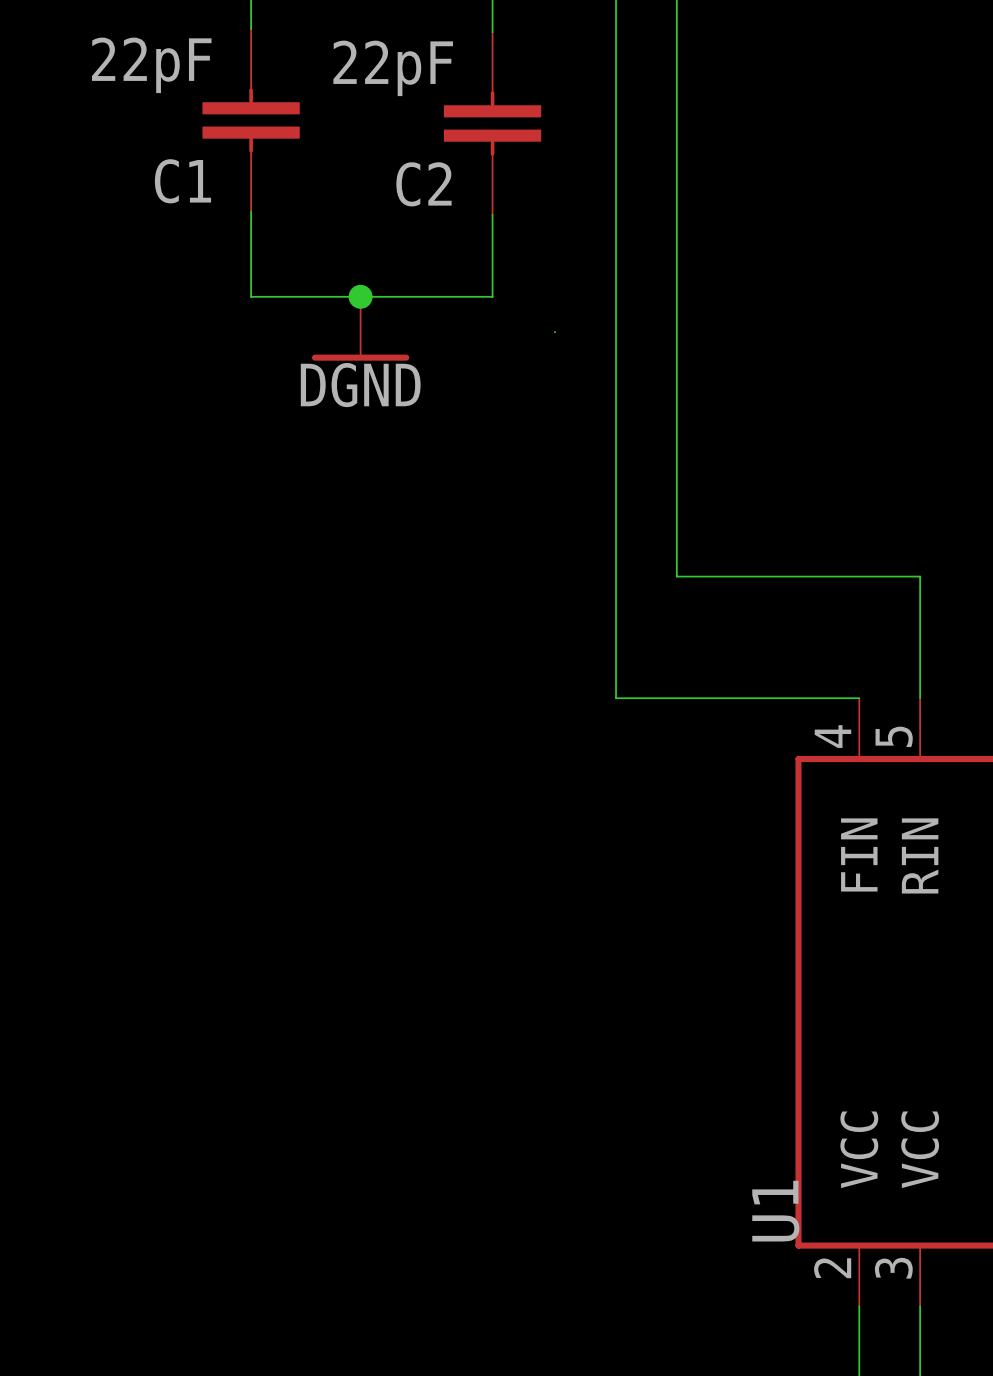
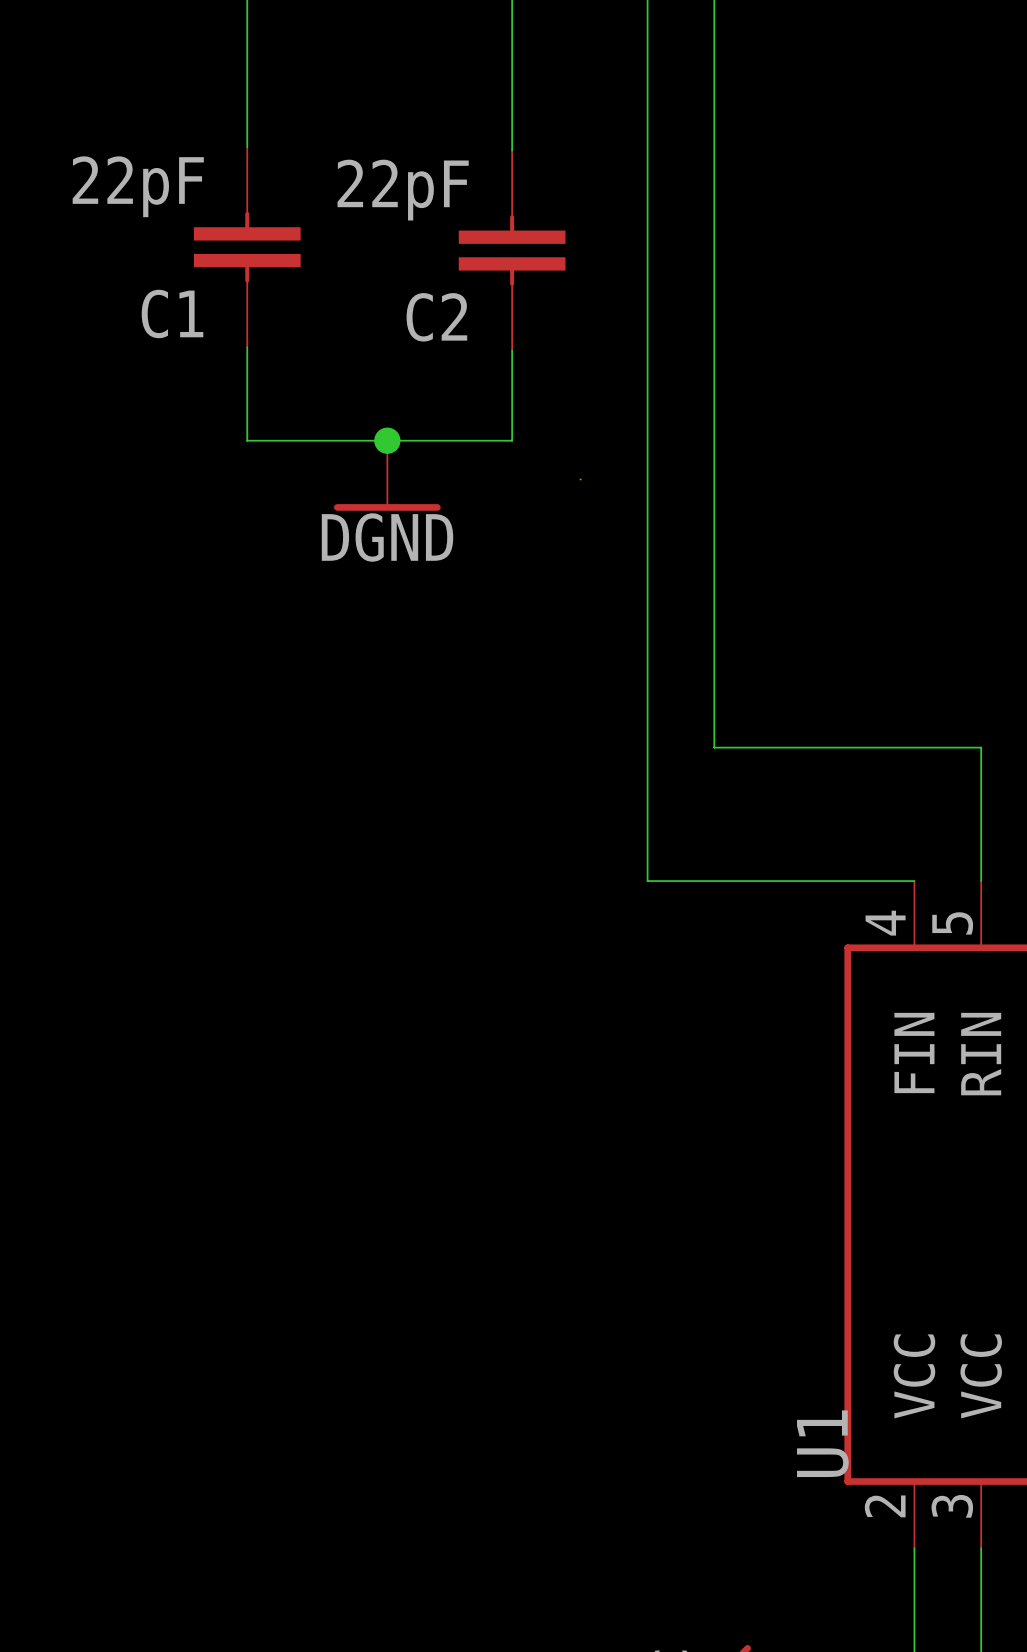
junction position: (360, 296) -> (387, 440)
power symbol position: DGND (360, 328) -> DGND (387, 475)

